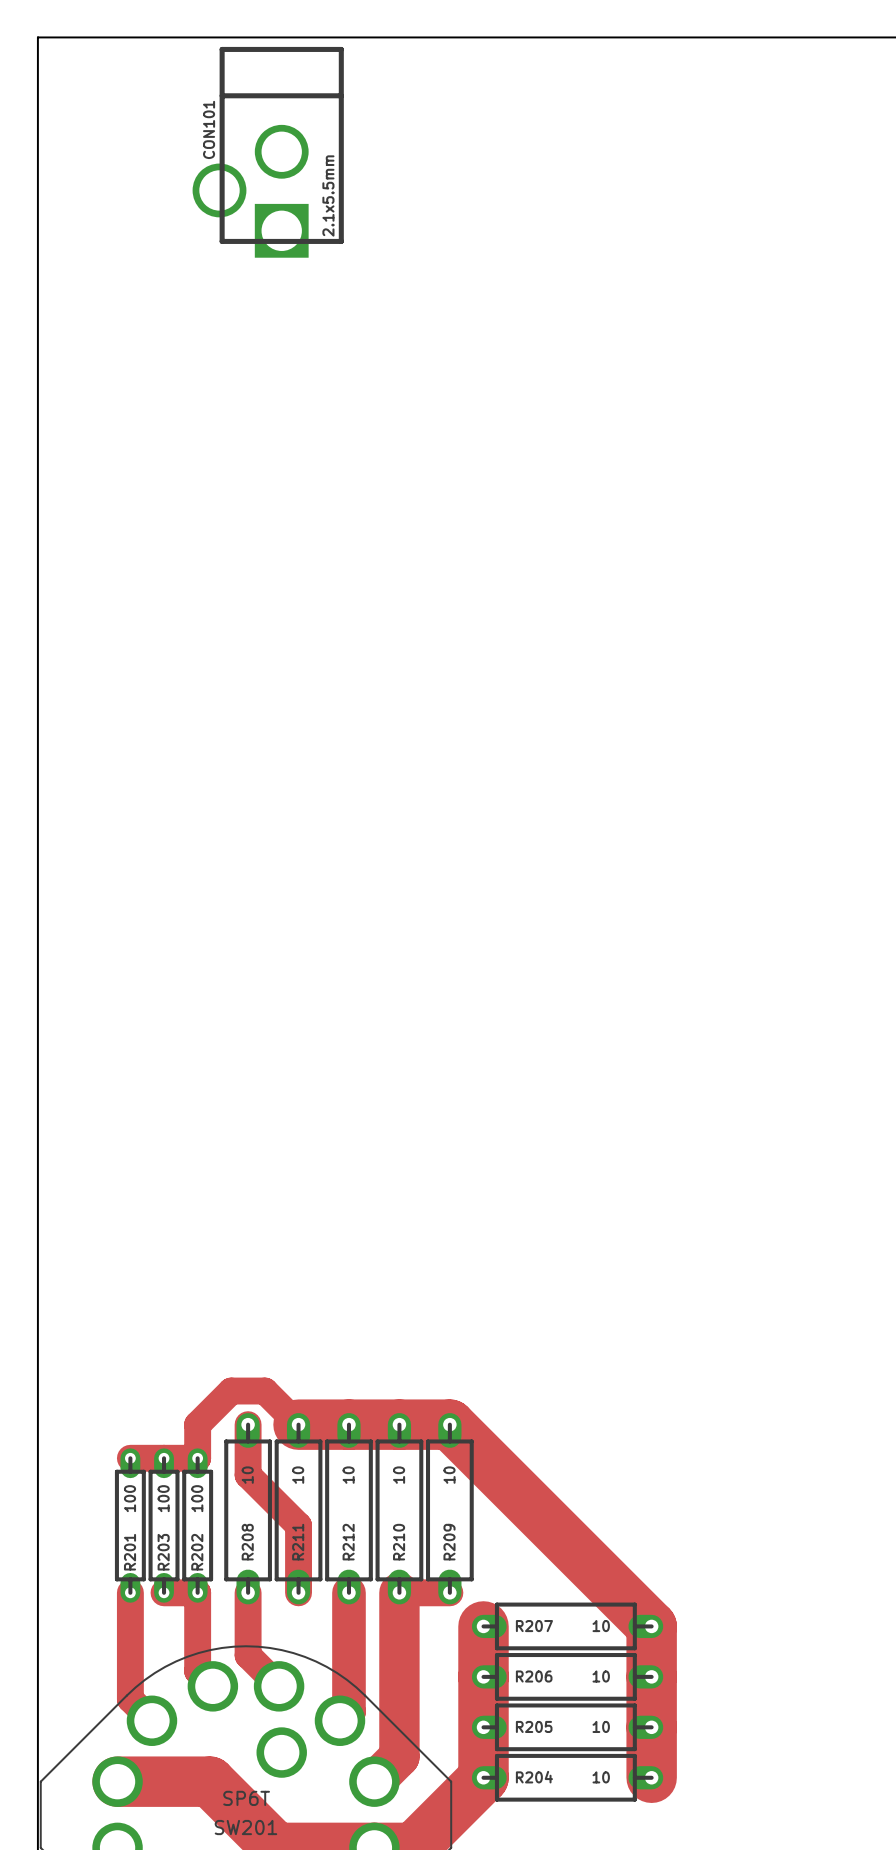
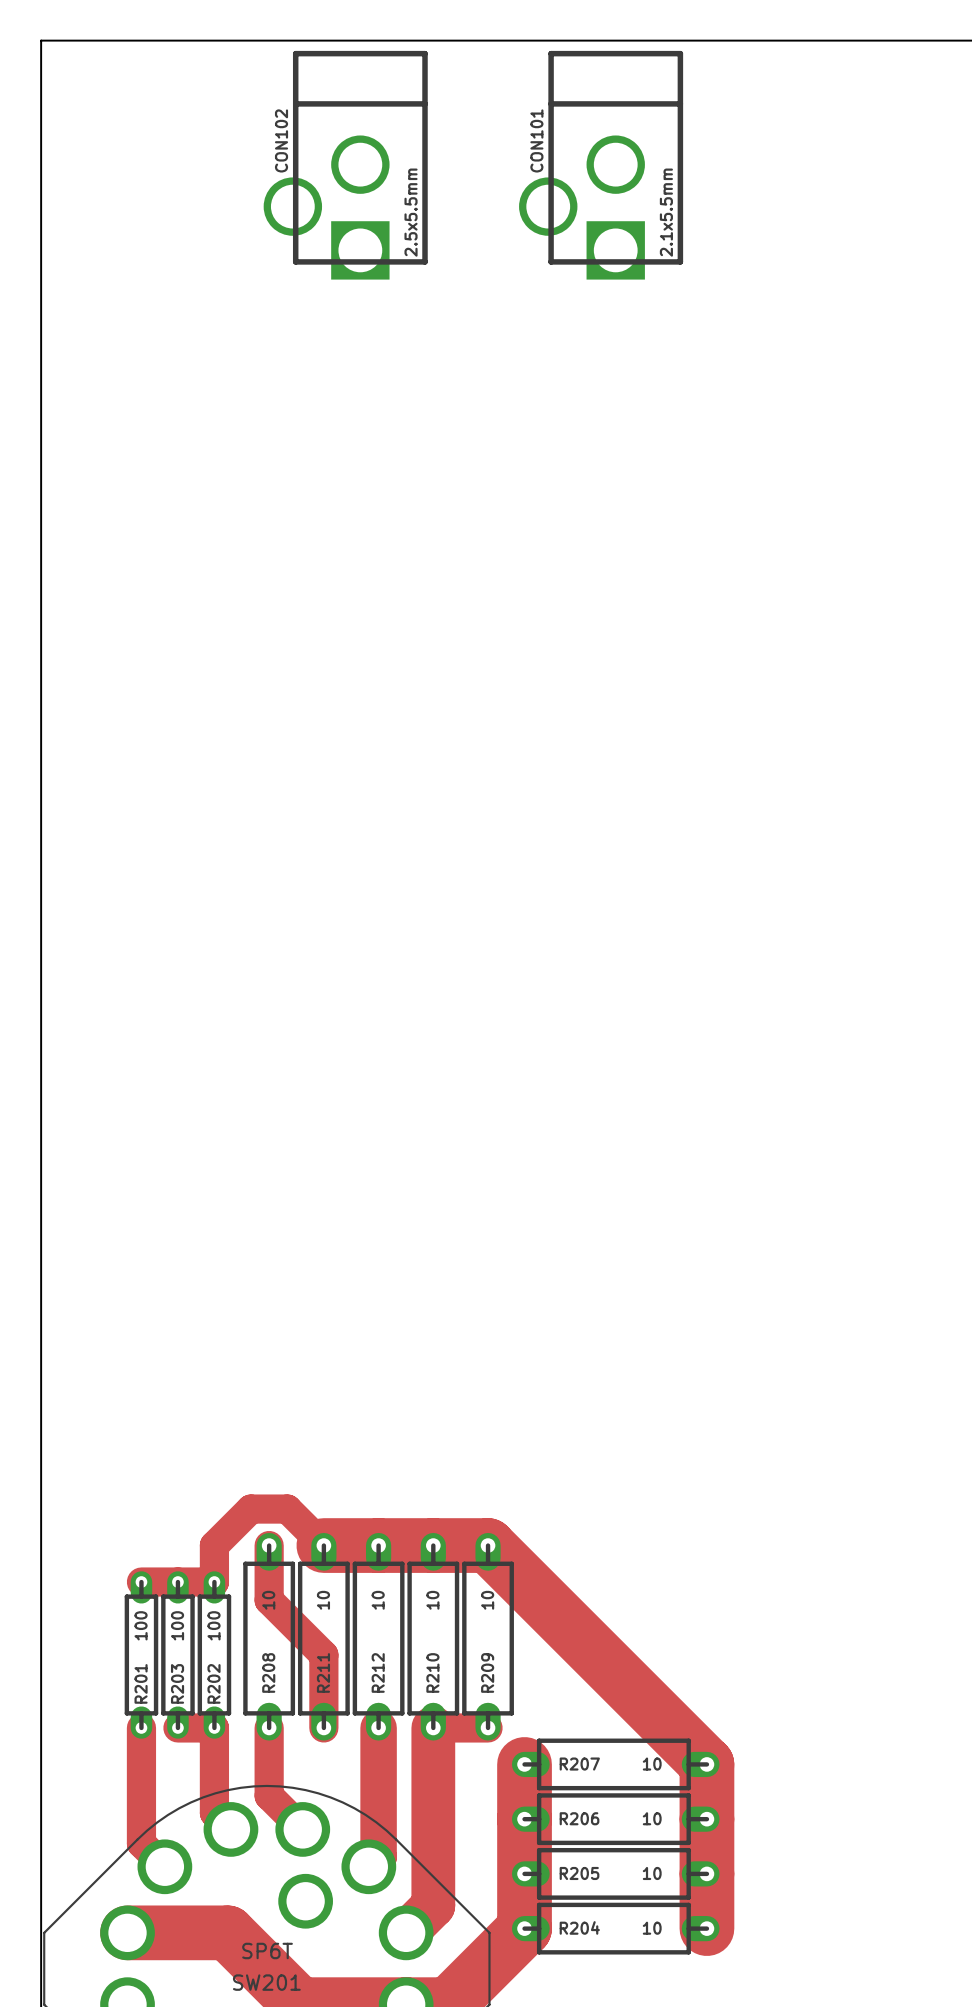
CON101 position: (268, 152) -> (601, 165)
CON102: none -> (345, 165)

